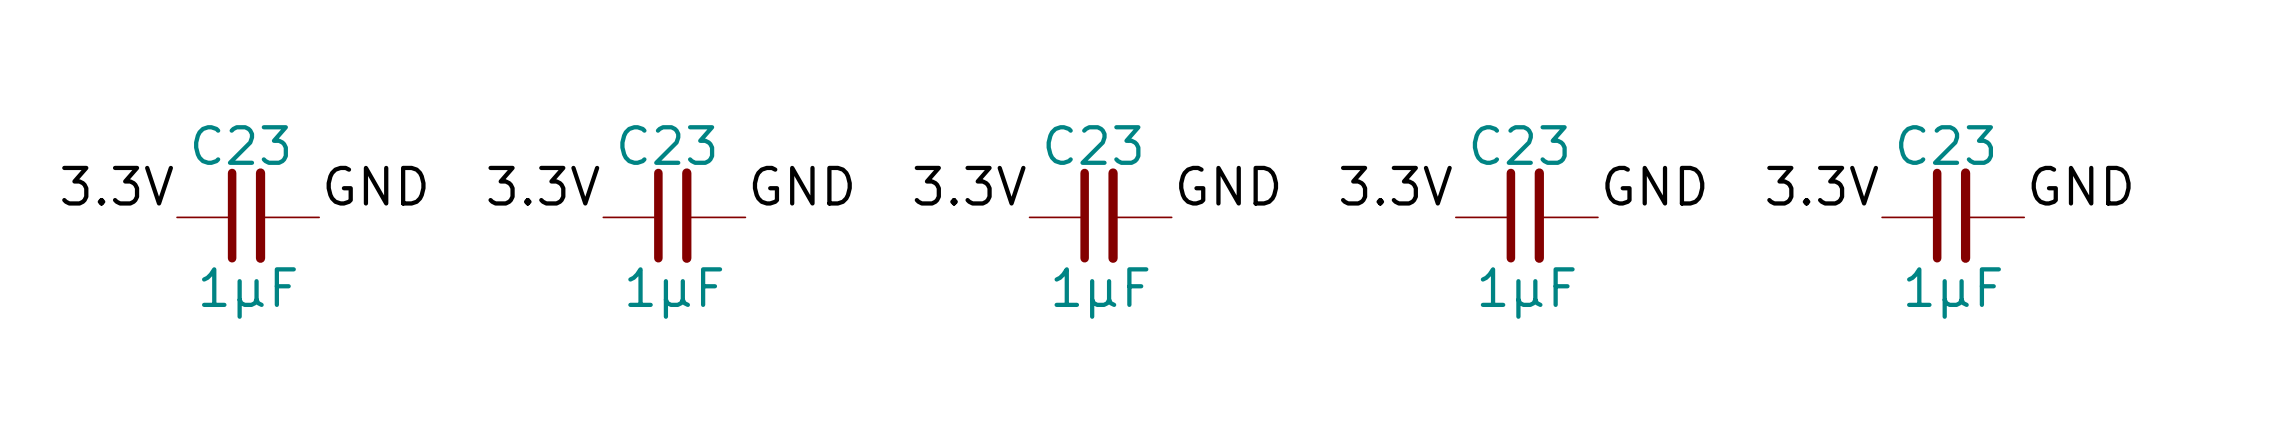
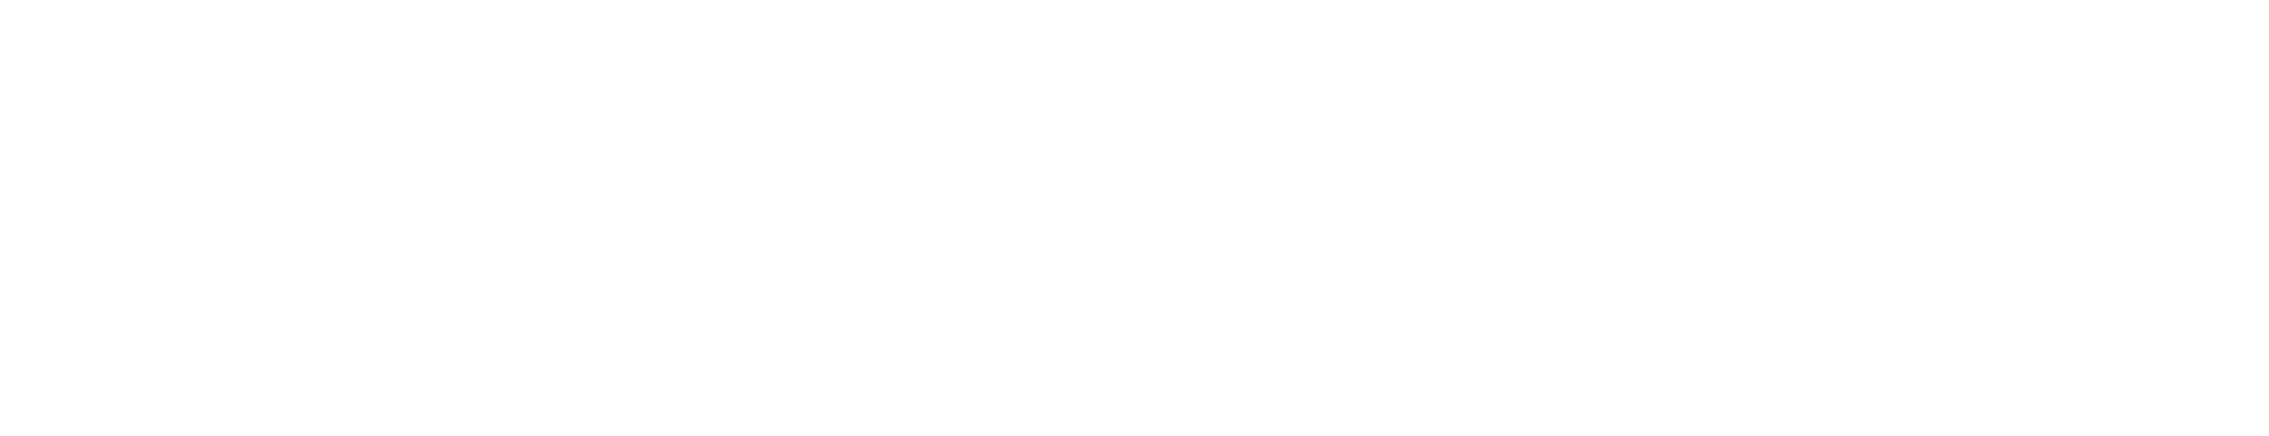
label: 3.3V (117, 185) -> none
label: GND (376, 185) -> none
label: 3.3V (543, 185) -> none
label: GND (802, 185) -> none
label: 3.3V (970, 185) -> none
label: GND (1228, 185) -> none
label: 3.3V (1396, 185) -> none
label: GND (1654, 185) -> none
label: 3.3V (1822, 185) -> none
label: GND (2081, 185) -> none
C23: 1μF (248, 215) -> none
C23: 1μF (674, 215) -> none
C23: 1μF (1100, 215) -> none
C23: 1μF (1526, 215) -> none
C23: 1μF (1953, 215) -> none

